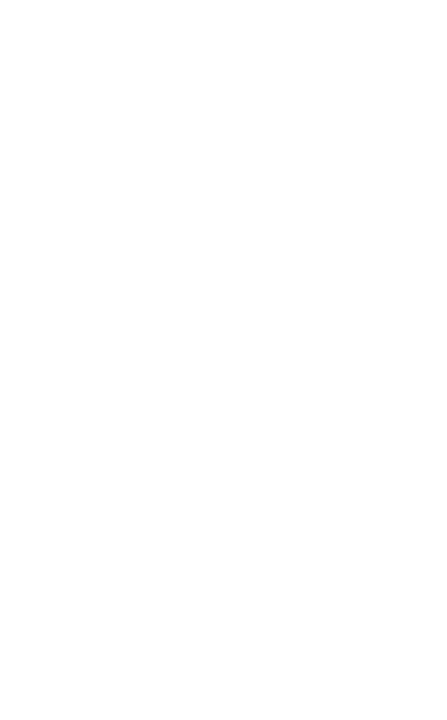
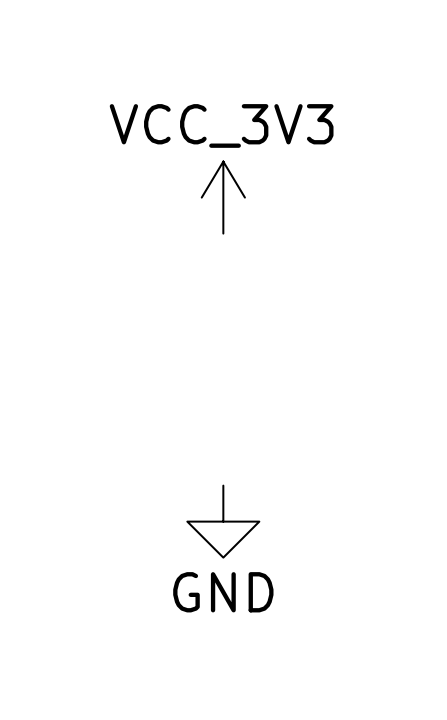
power symbol: none -> VCC_3V3 (223, 197)
power symbol: none -> GND (223, 521)

